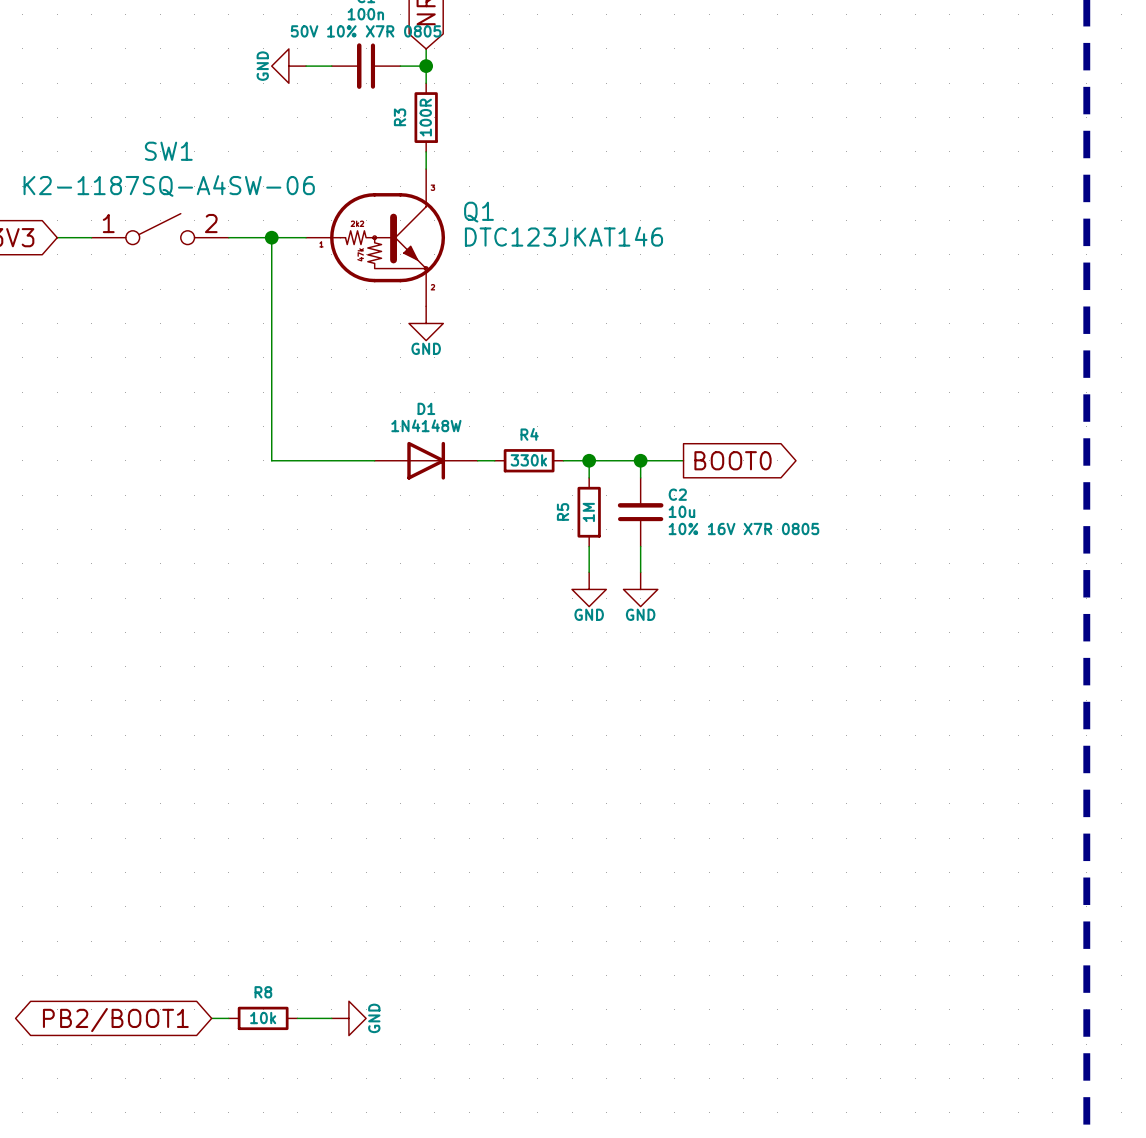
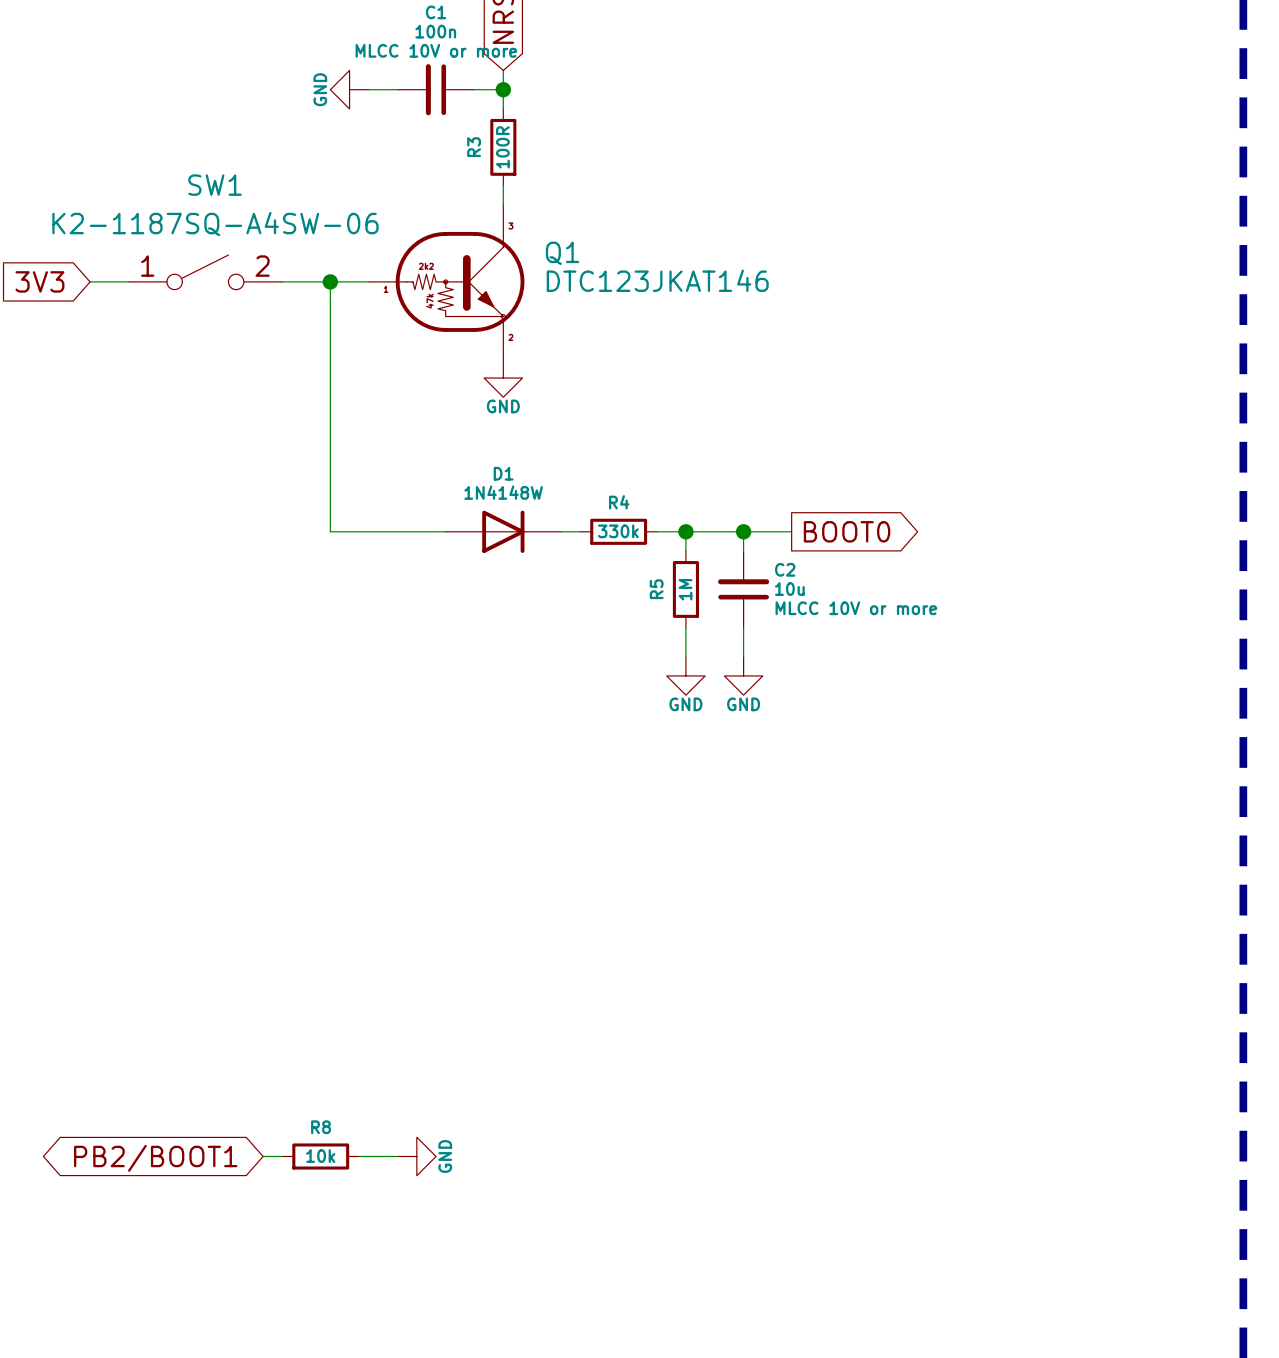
C1 text: 50V 10% X7R 0805 (366, 31) -> MLCC 10V or more (436, 50)
C2 text: 10% 16V X7R 0805 (743, 529) -> MLCC 10V or more (856, 608)

